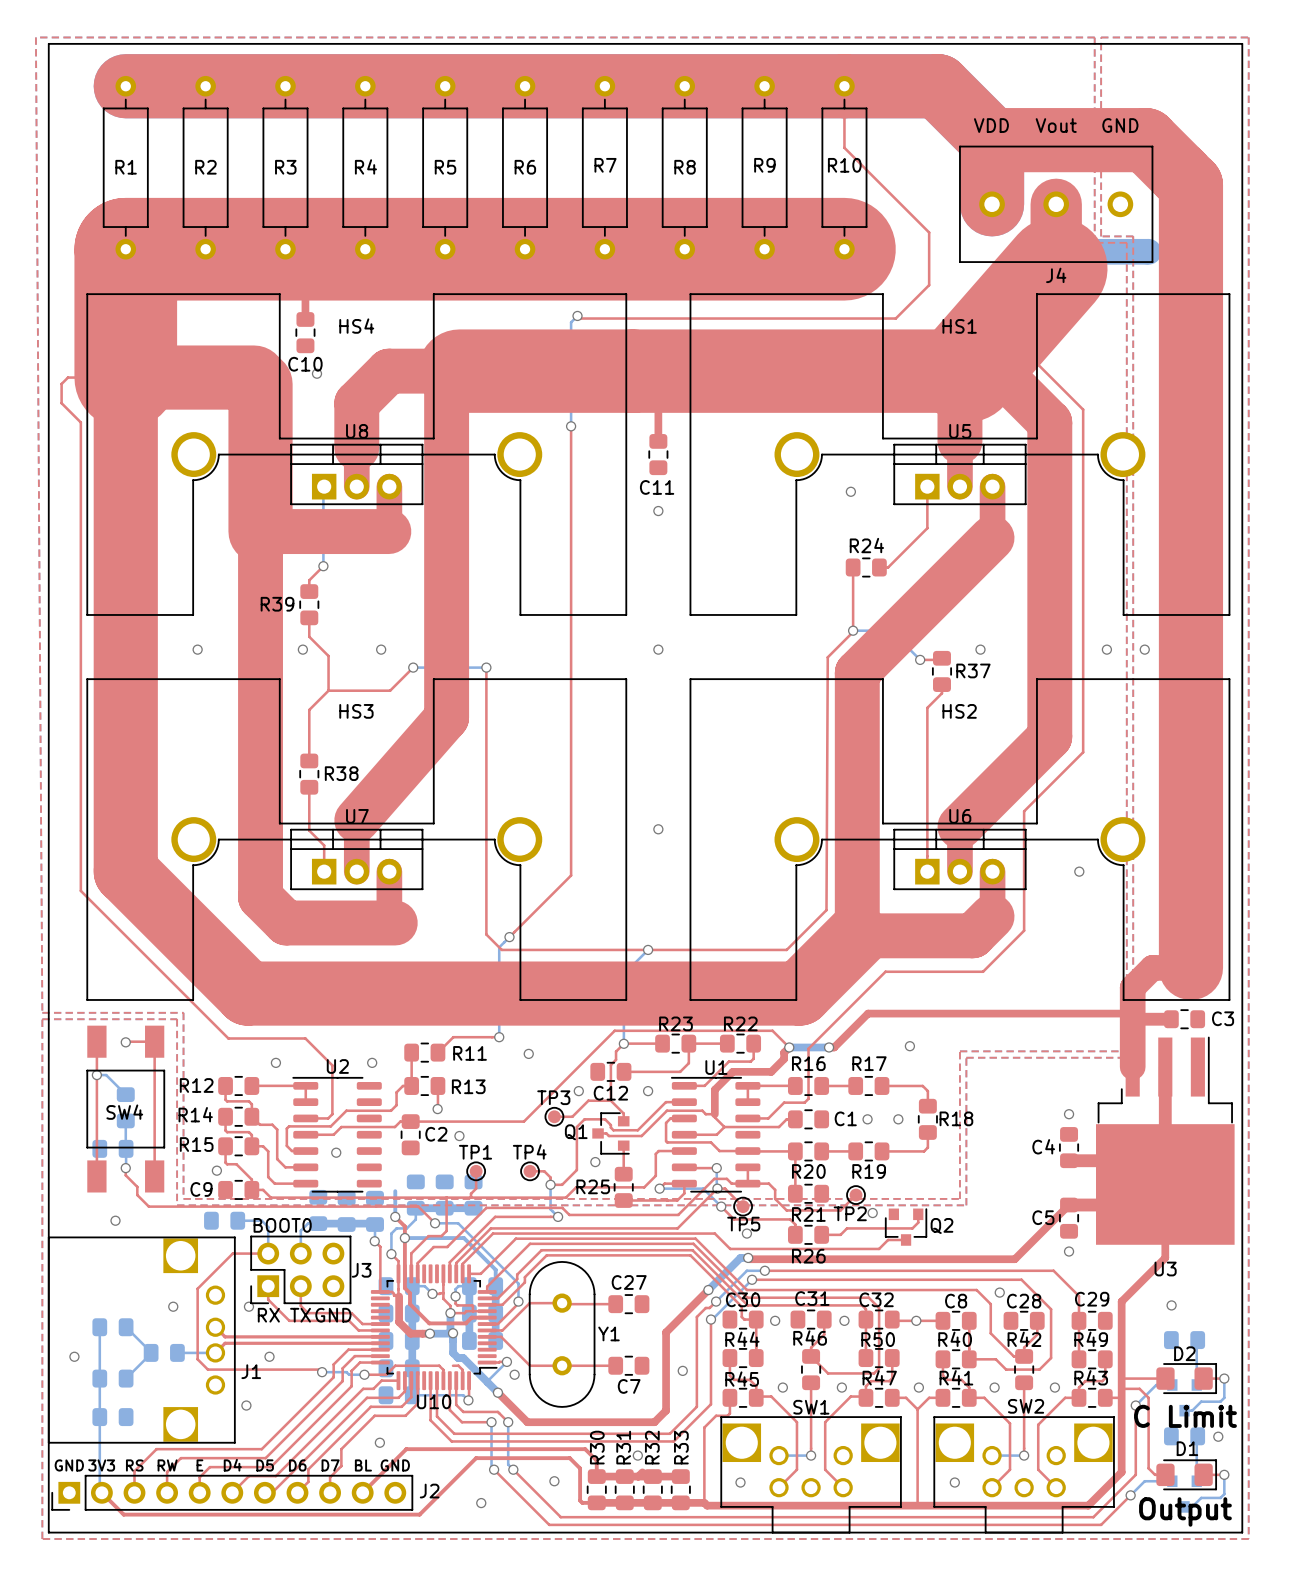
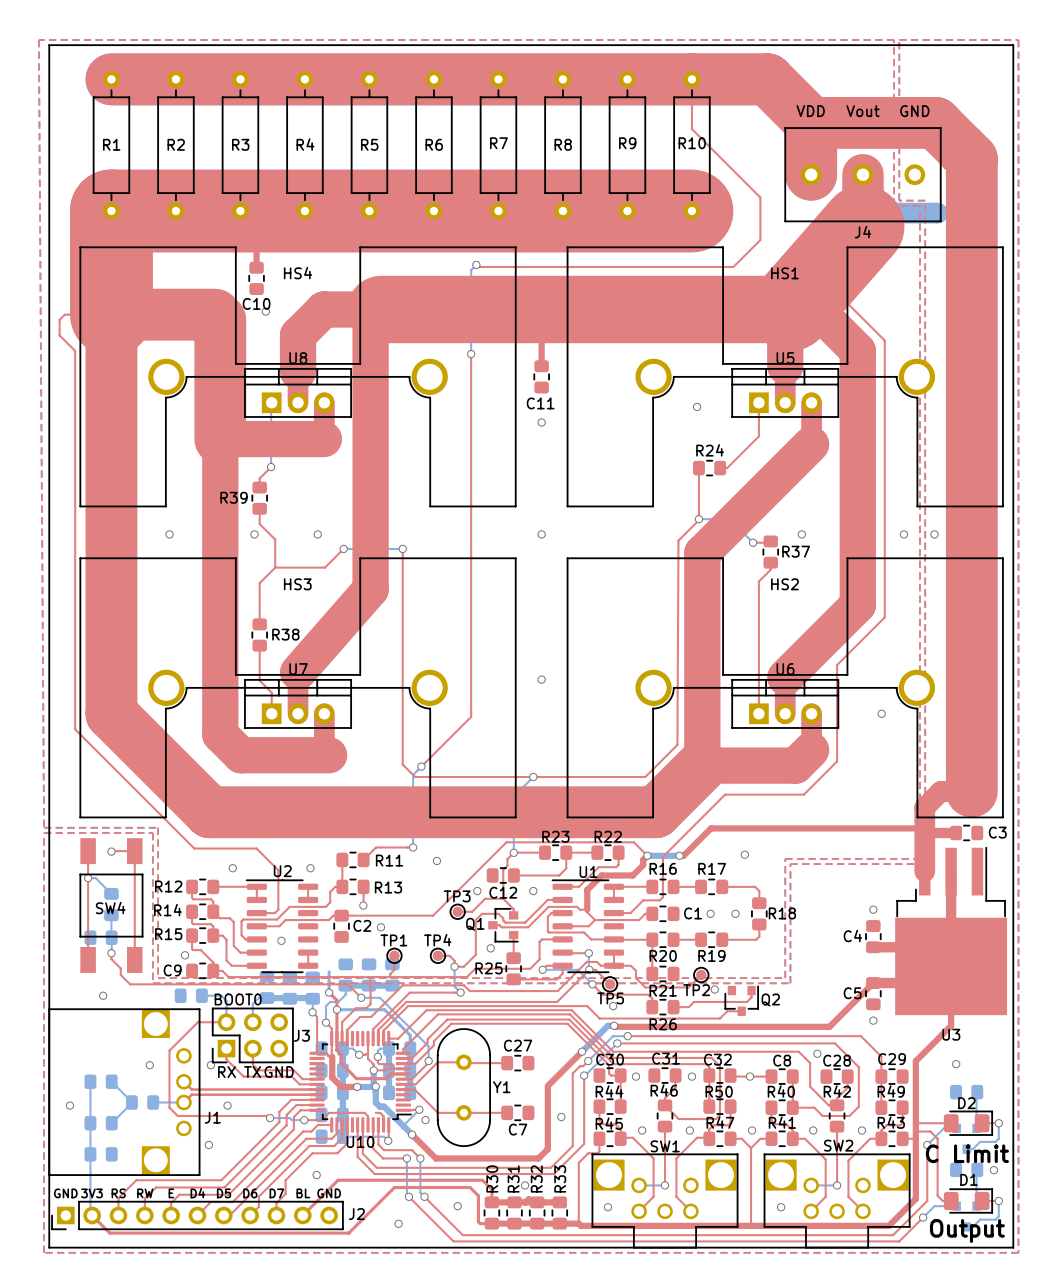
top track: none -> (308, 886) (308, 899)
top track: none -> (308, 952) (308, 965)

